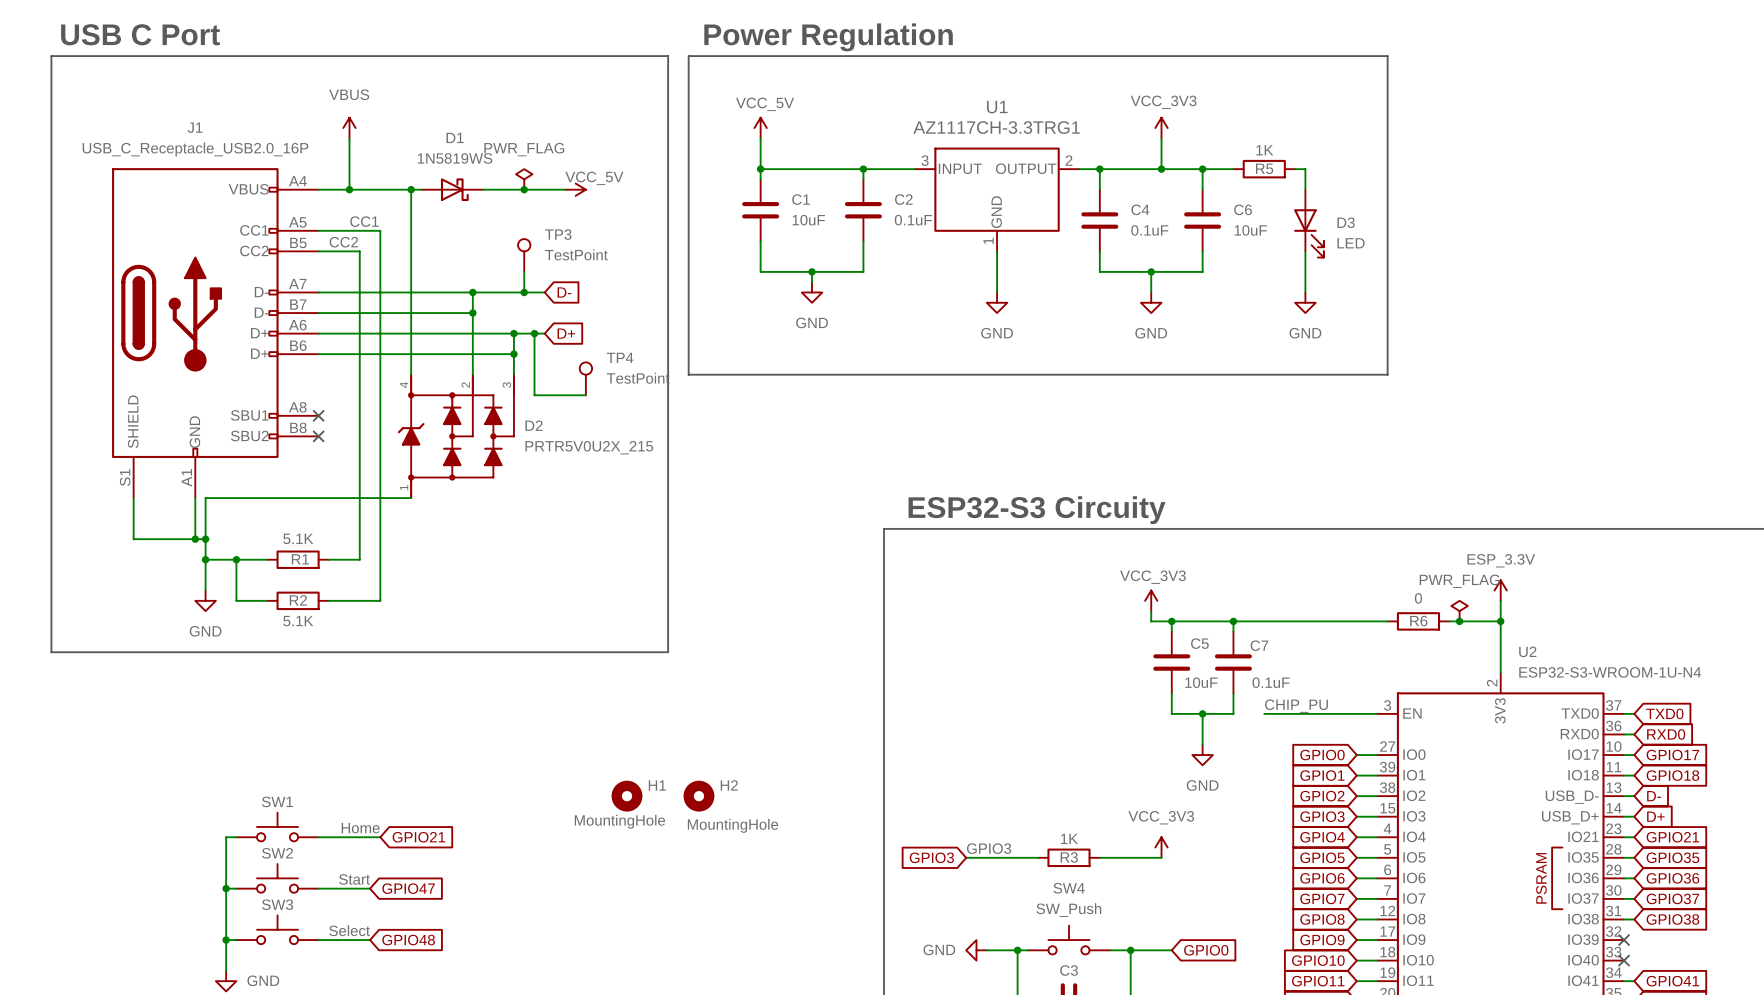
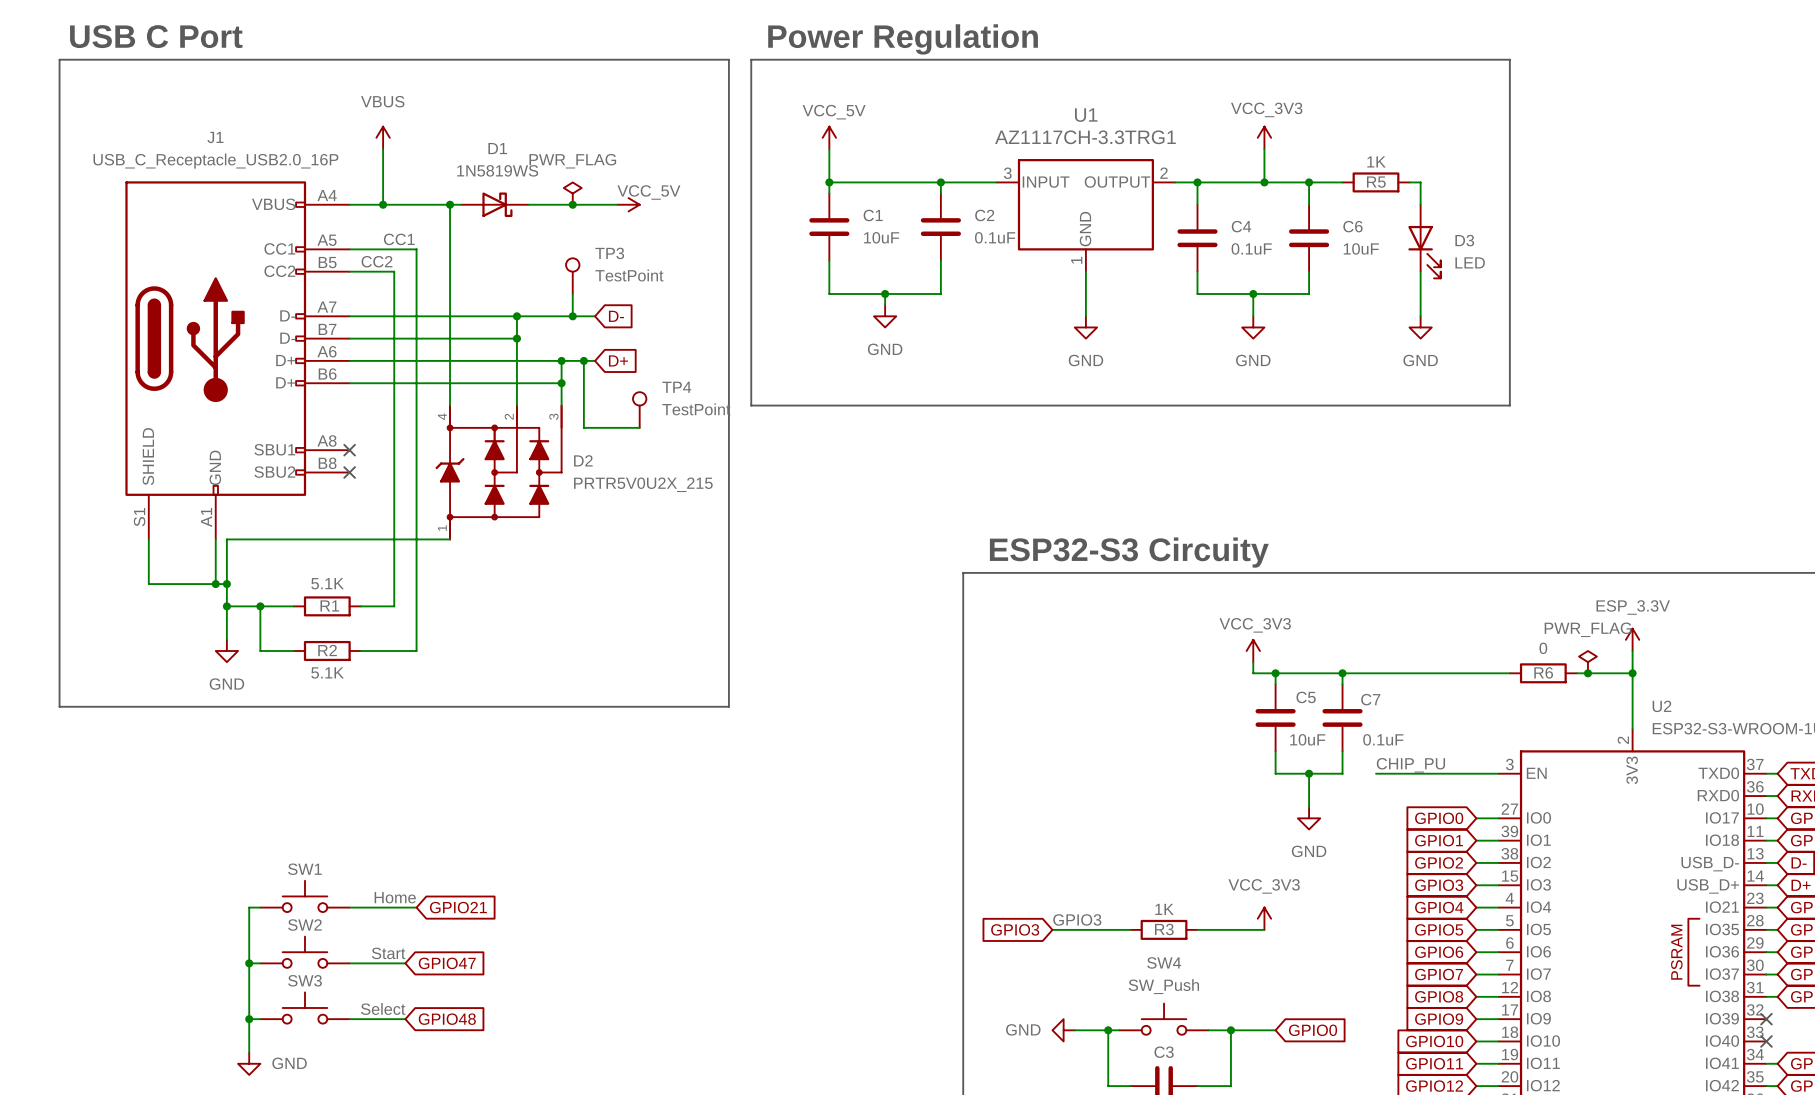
H1: MountingHole (627, 796) -> none
H2: MountingHole (698, 796) -> none

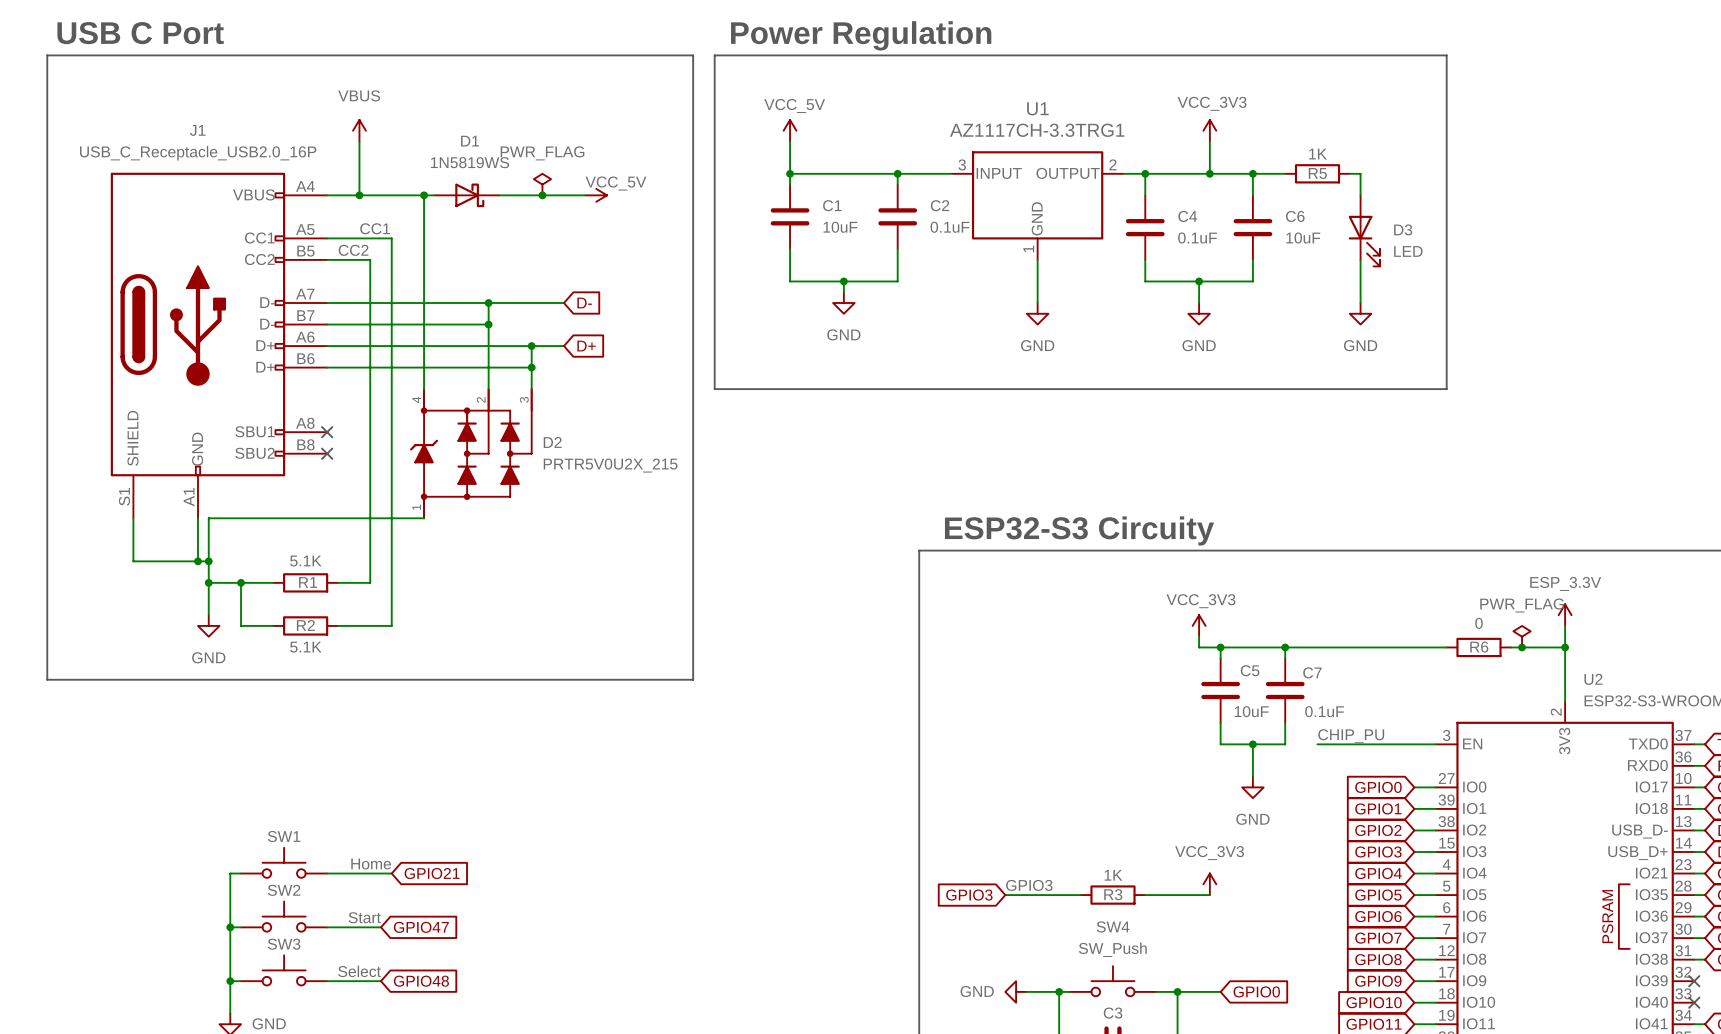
TP3: TestPoint (572, 276) -> none
wire: (572, 293) (572, 316) -> none
junction: (572, 316) -> none
wire: (583, 360) (583, 427) (639, 427) -> none
junction: (583, 360) -> none
TP4: TestPoint (639, 410) -> none

